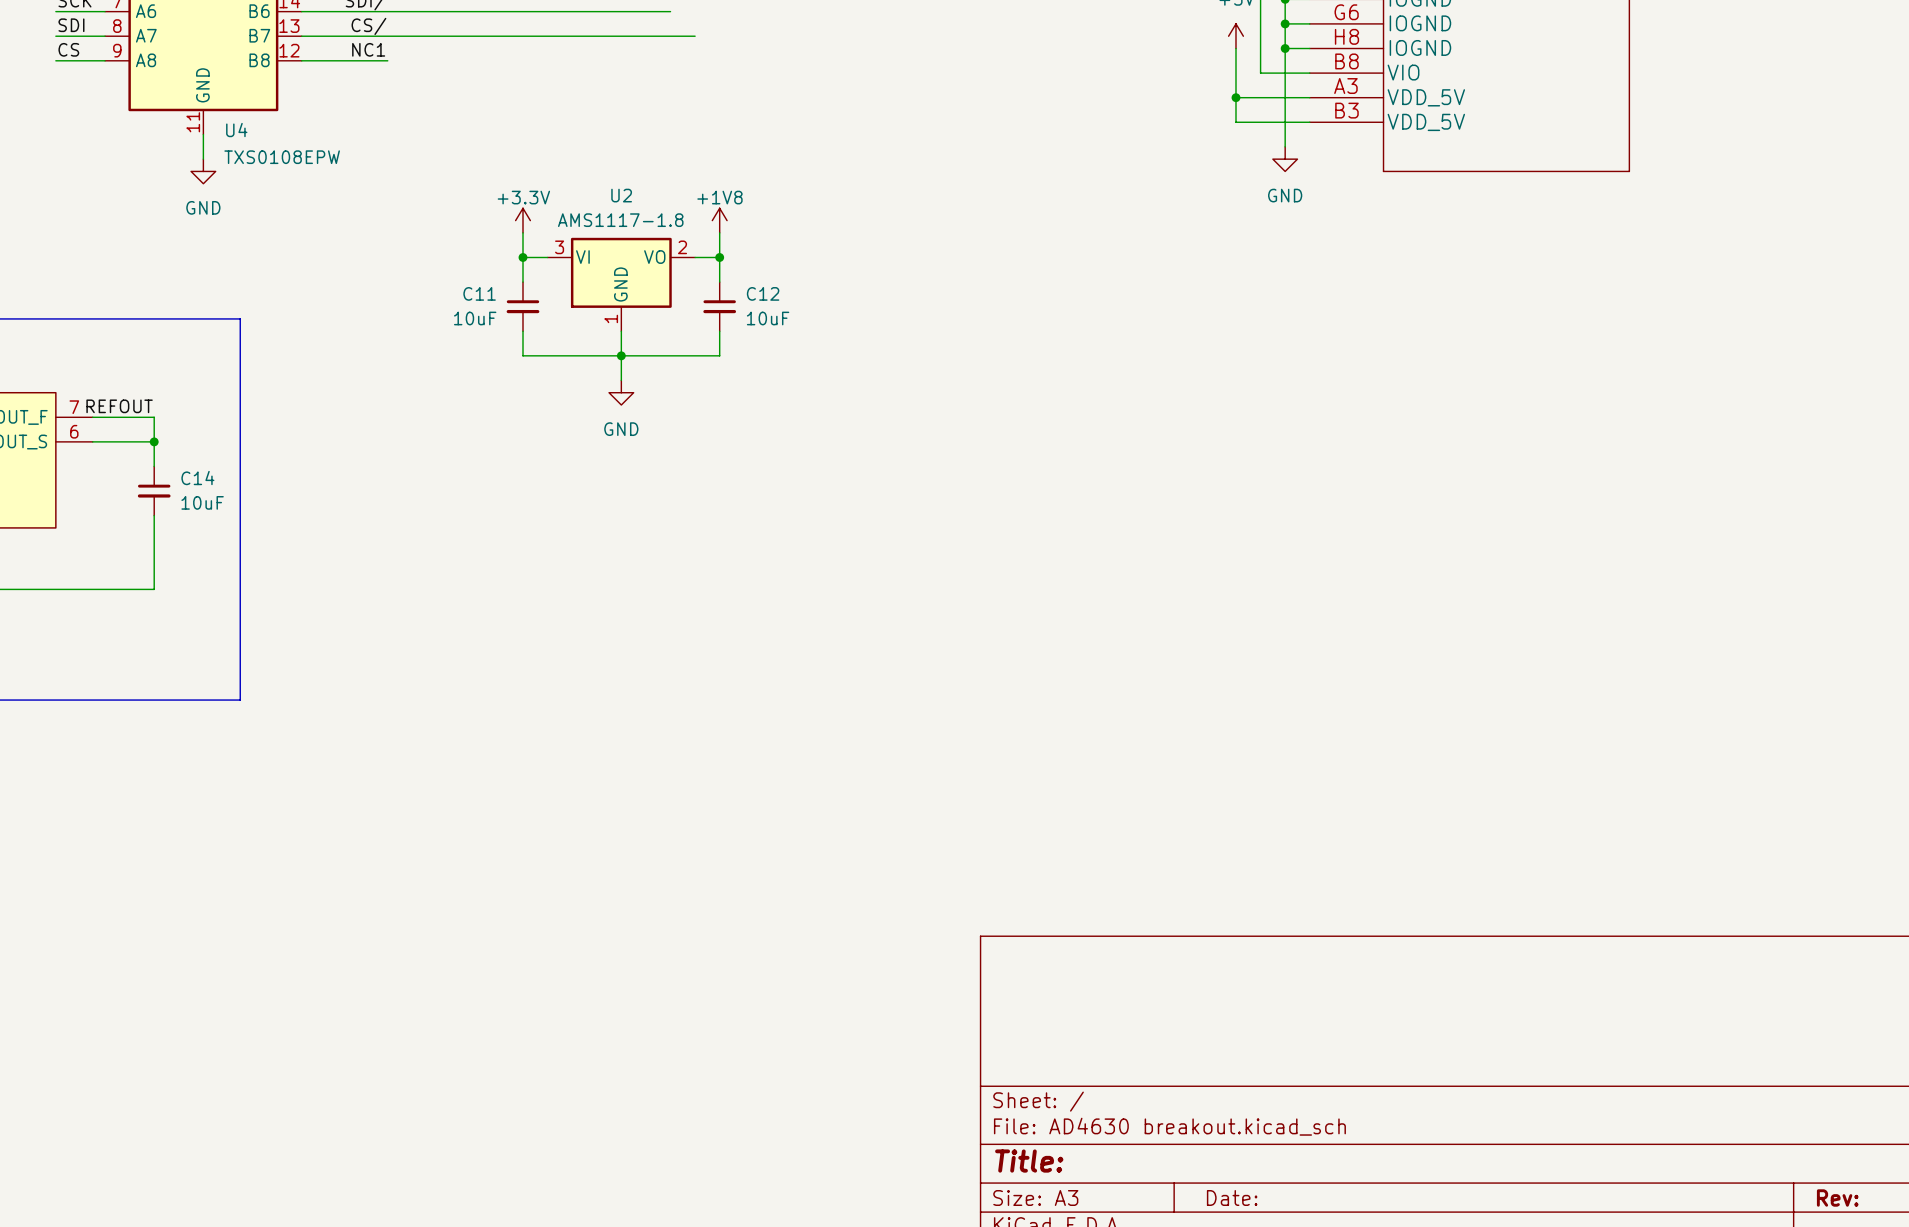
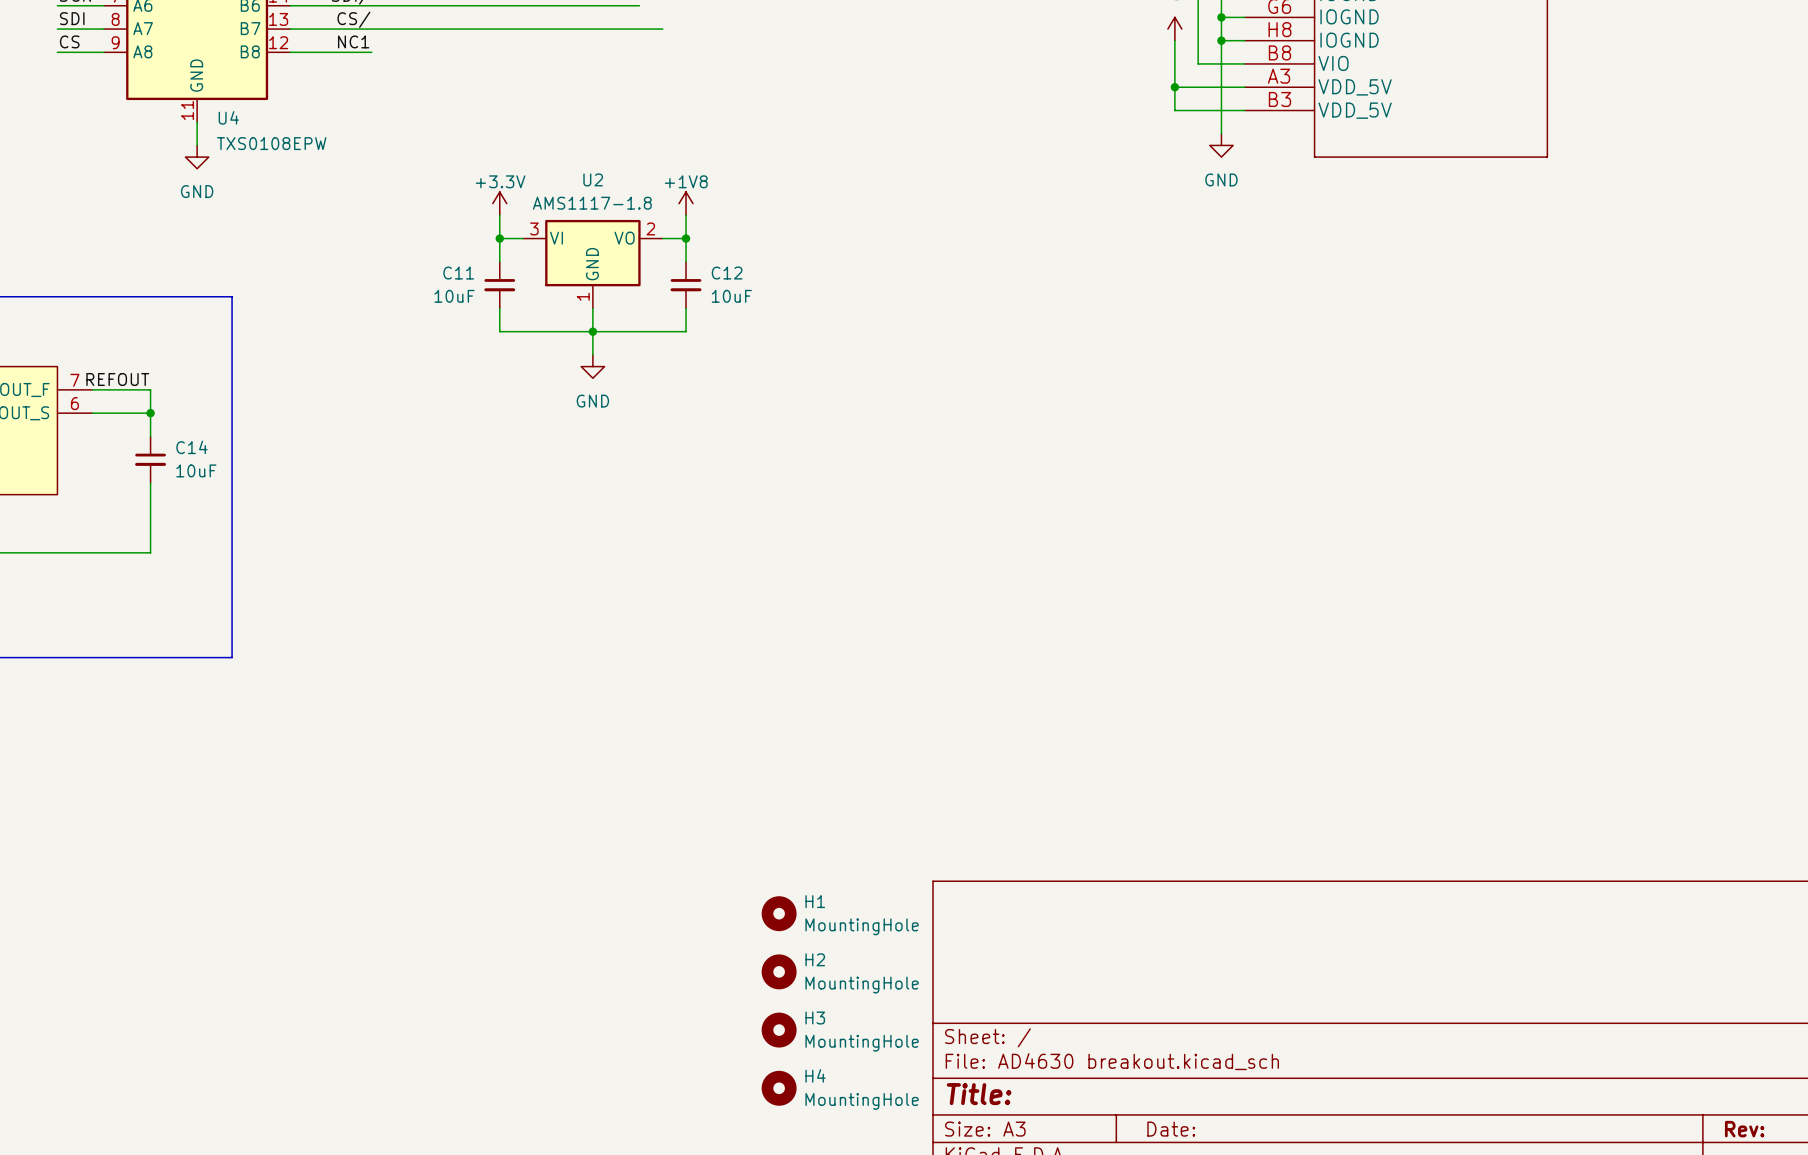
H1: none -> MountingHole (779, 913)
H2: none -> MountingHole (779, 971)
H3: none -> MountingHole (779, 1030)
H4: none -> MountingHole (779, 1088)

